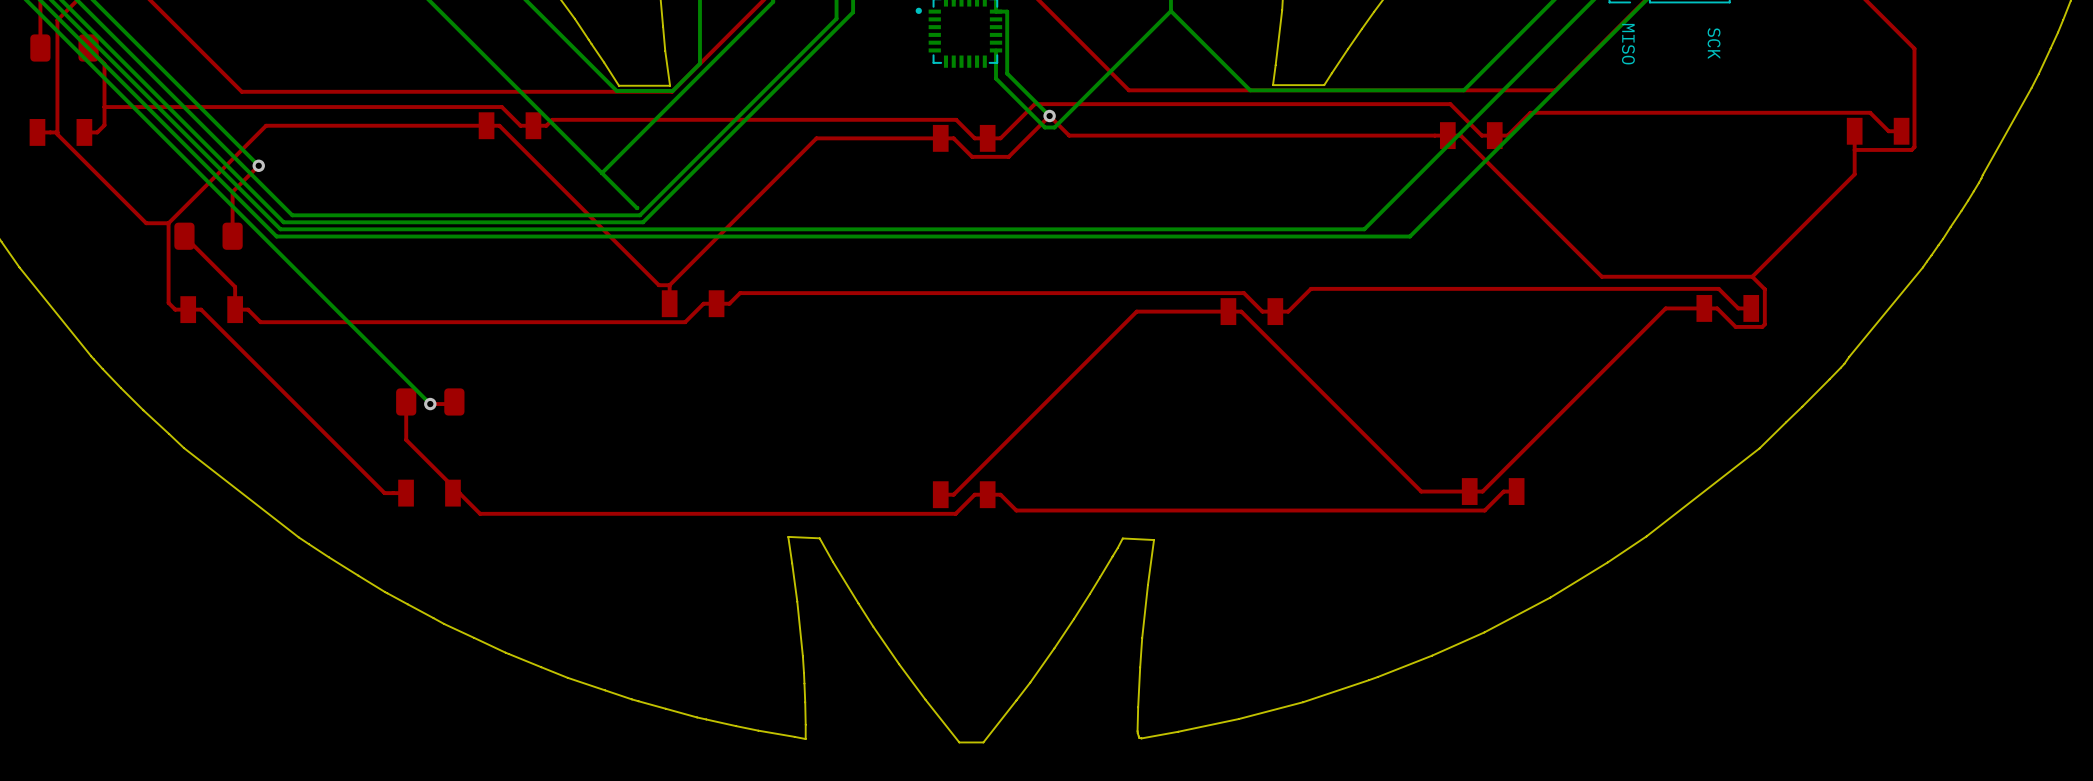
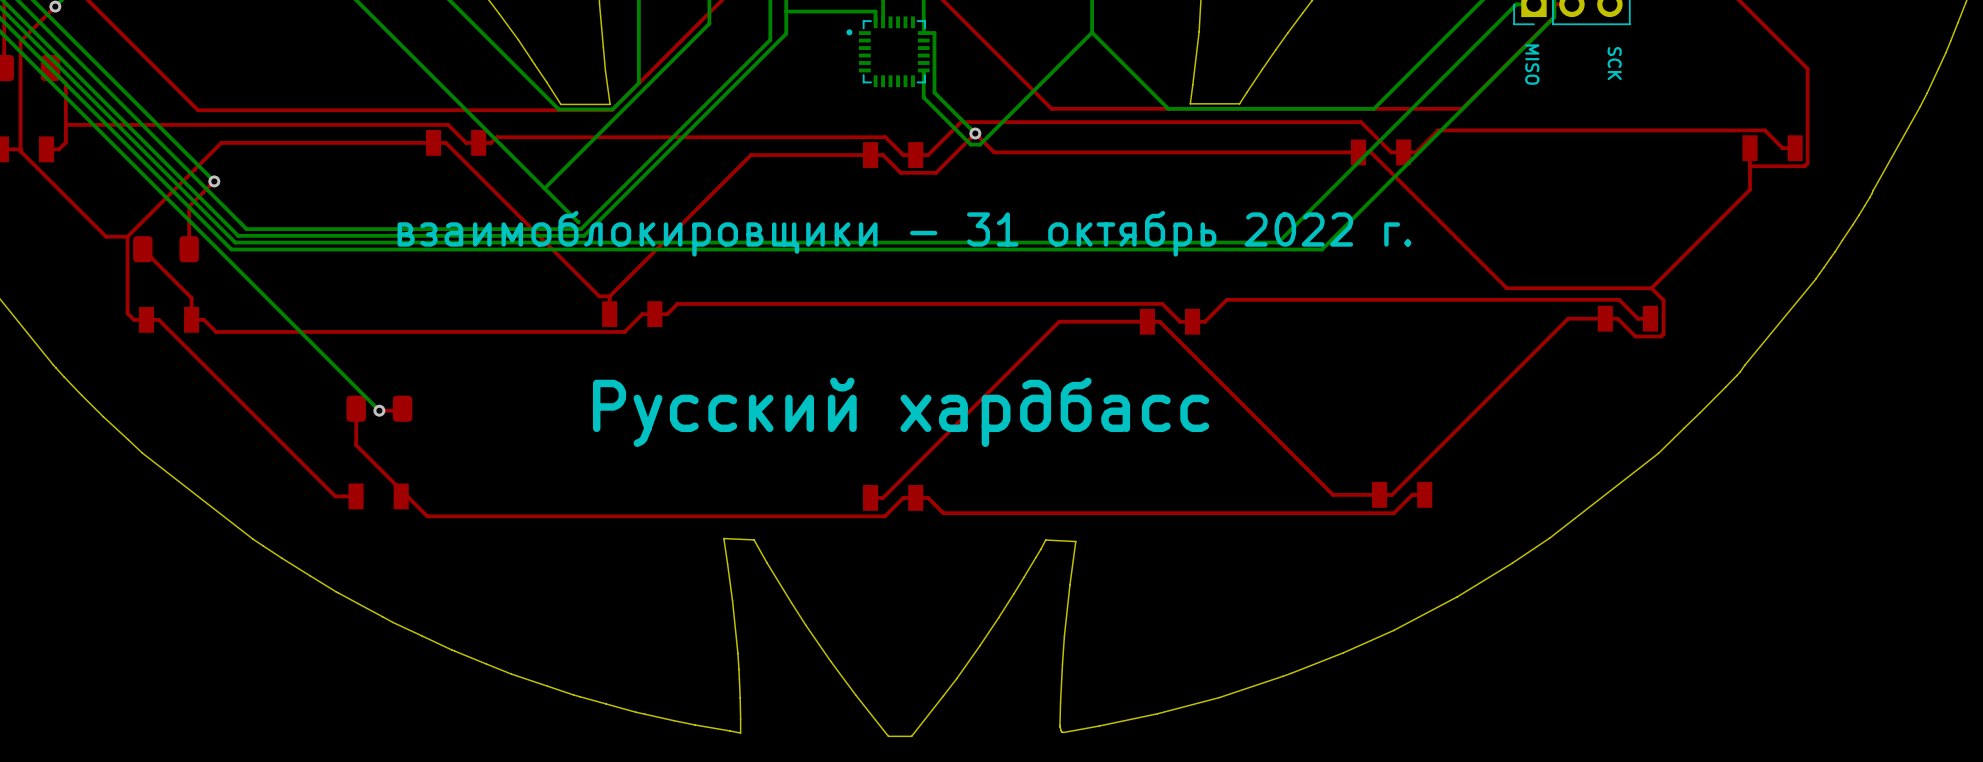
text: none -> взаимоблокировщики - 31 октябрь 2022 г. (904, 233)
text: none -> Русский хардбасс (901, 412)

